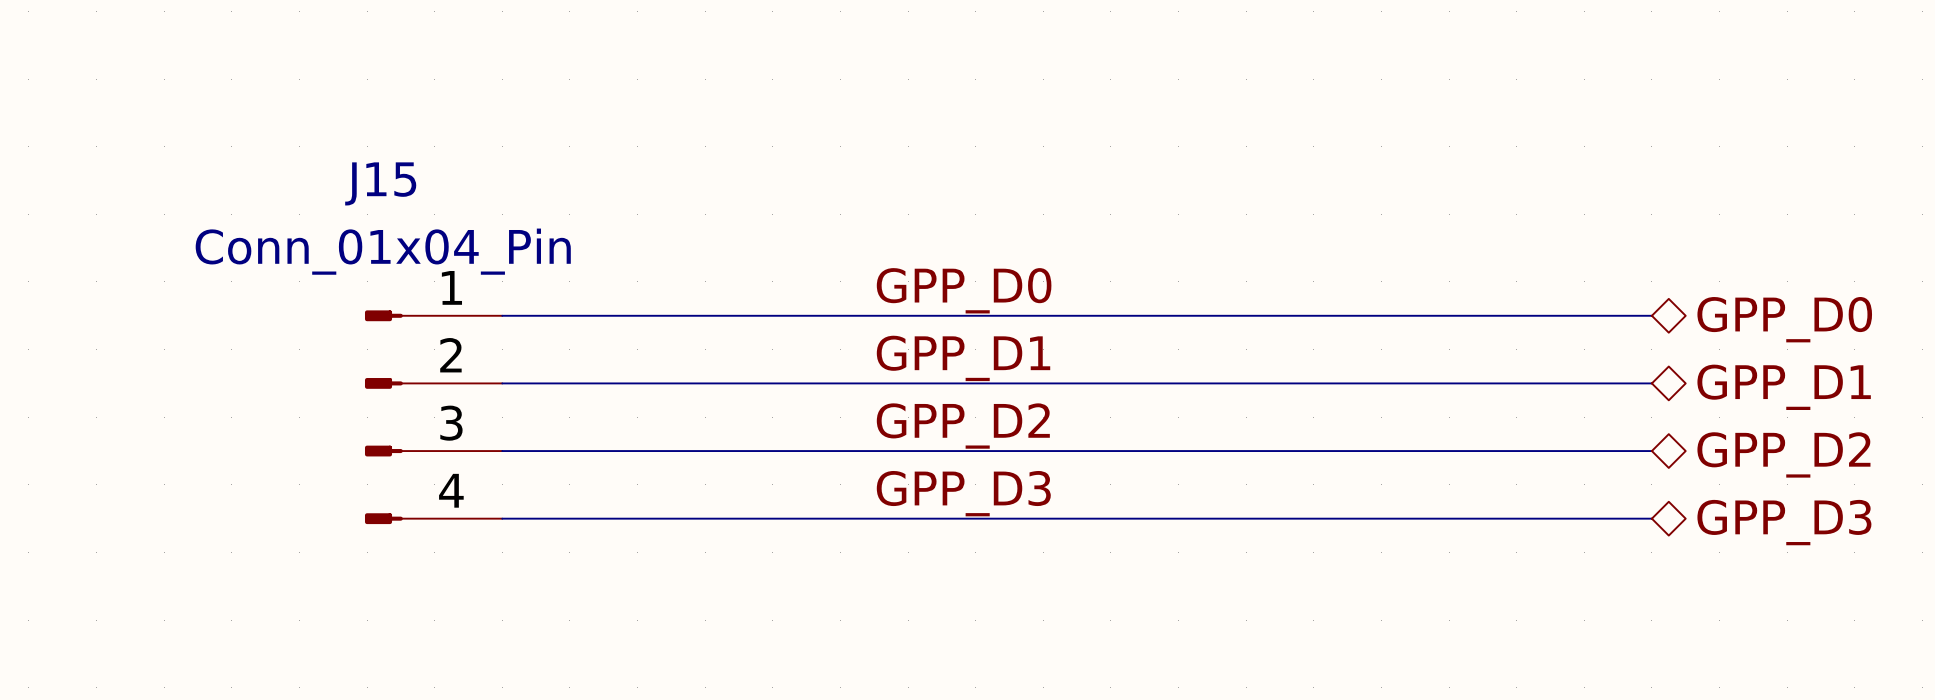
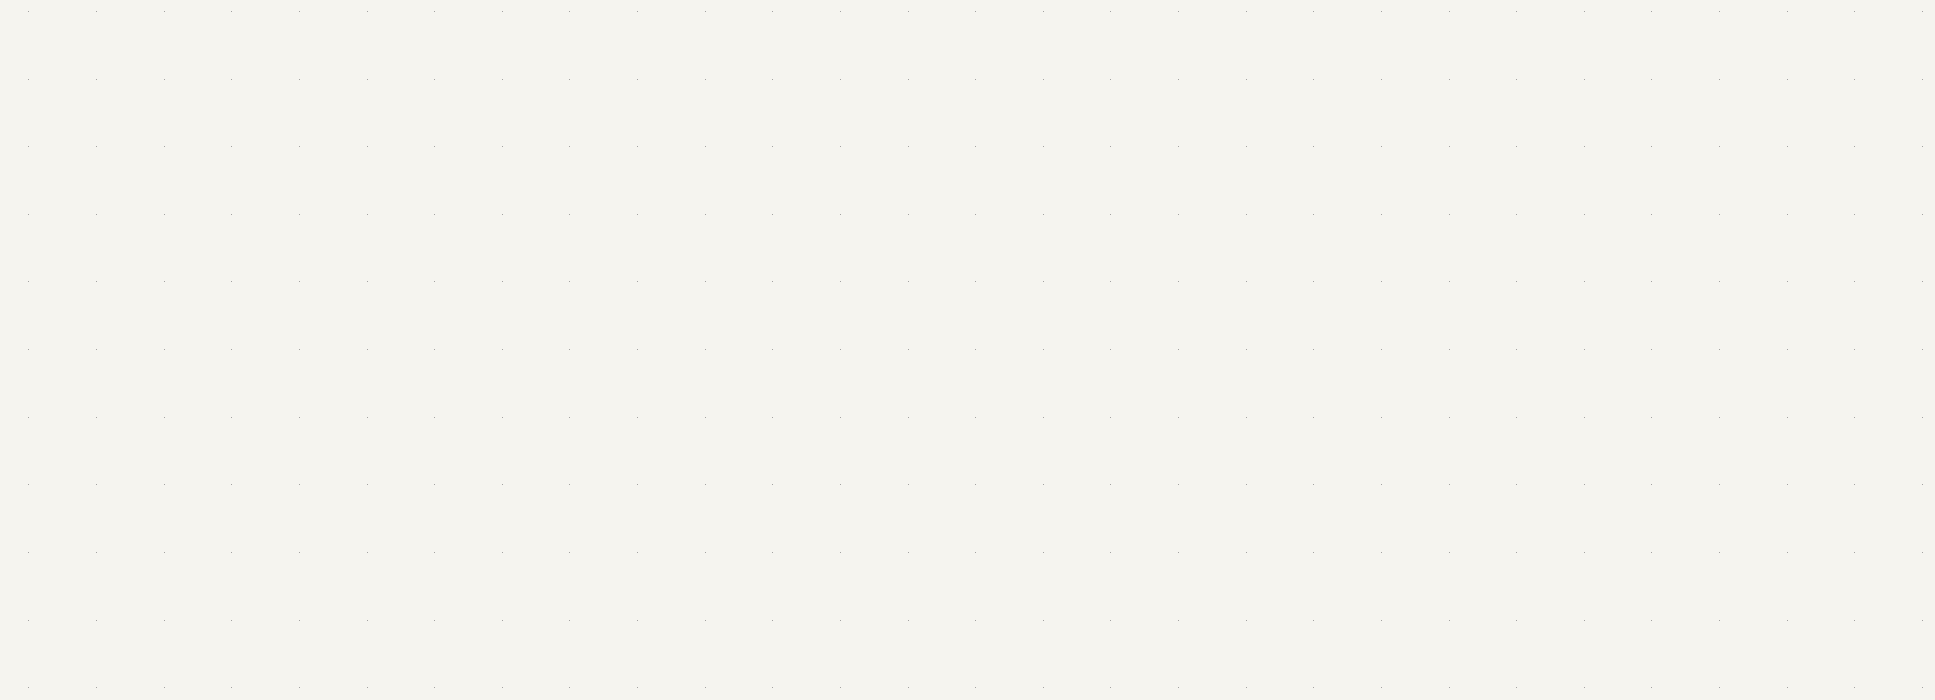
label: GPP_D0 (964, 290) -> none
wire: (502, 315) (1651, 315) -> none
hierarchical label: GPP_D0 (1784, 319) -> none
label: GPP_D1 (963, 358) -> none
wire: (502, 383) (1651, 383) -> none
hierarchical label: GPP_D1 (1784, 387) -> none
J15: Conn_01x04_Pin (433, 417) -> none
label: GPP_D2 (963, 426) -> none
wire: (502, 451) (1651, 451) -> none
hierarchical label: GPP_D2 (1783, 454) -> none
label: GPP_D3 (963, 493) -> none
wire: (502, 518) (1651, 518) -> none
hierarchical label: GPP_D3 (1784, 522) -> none

